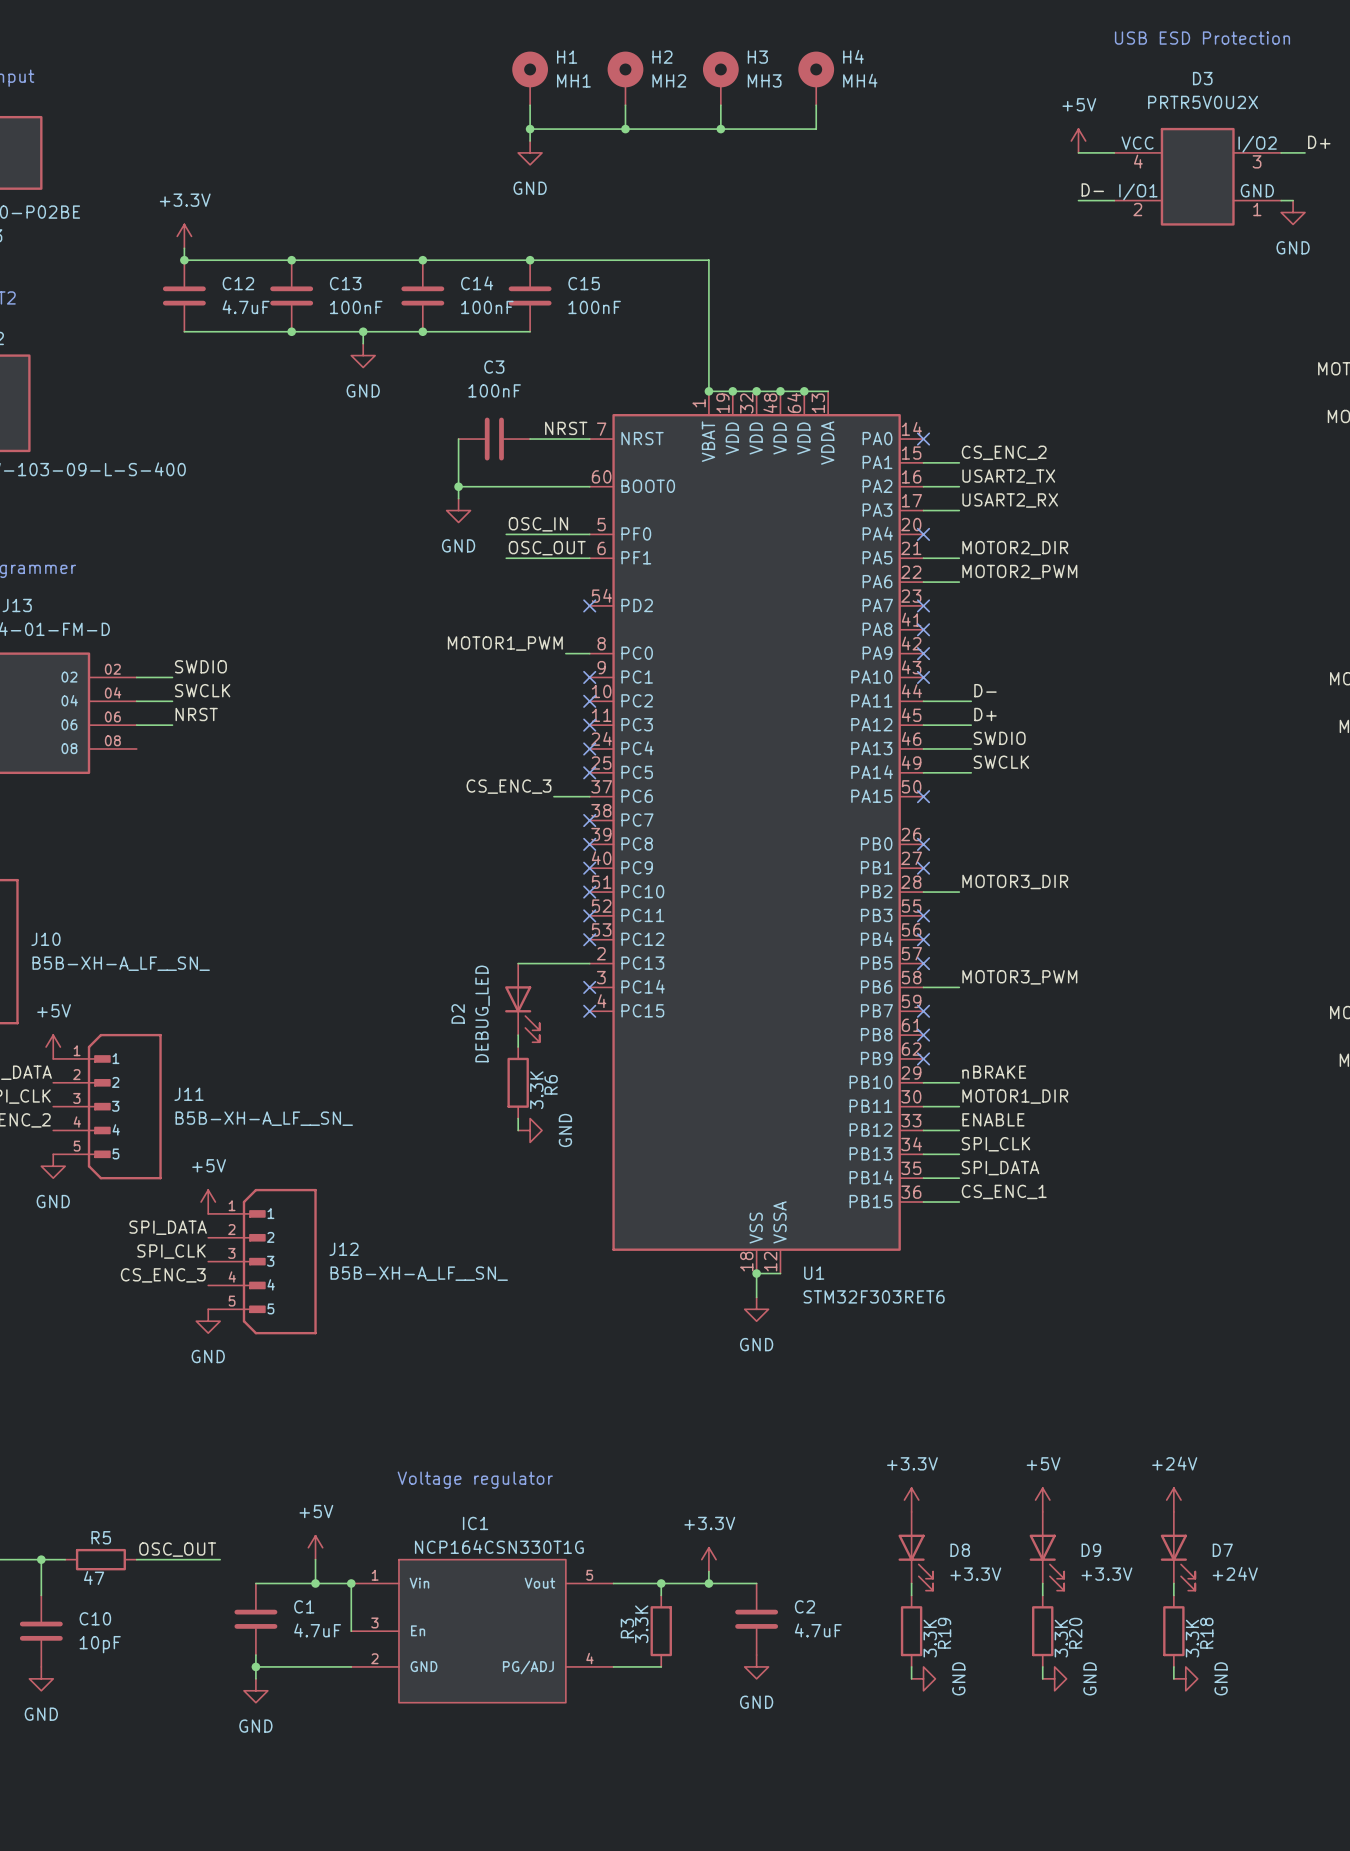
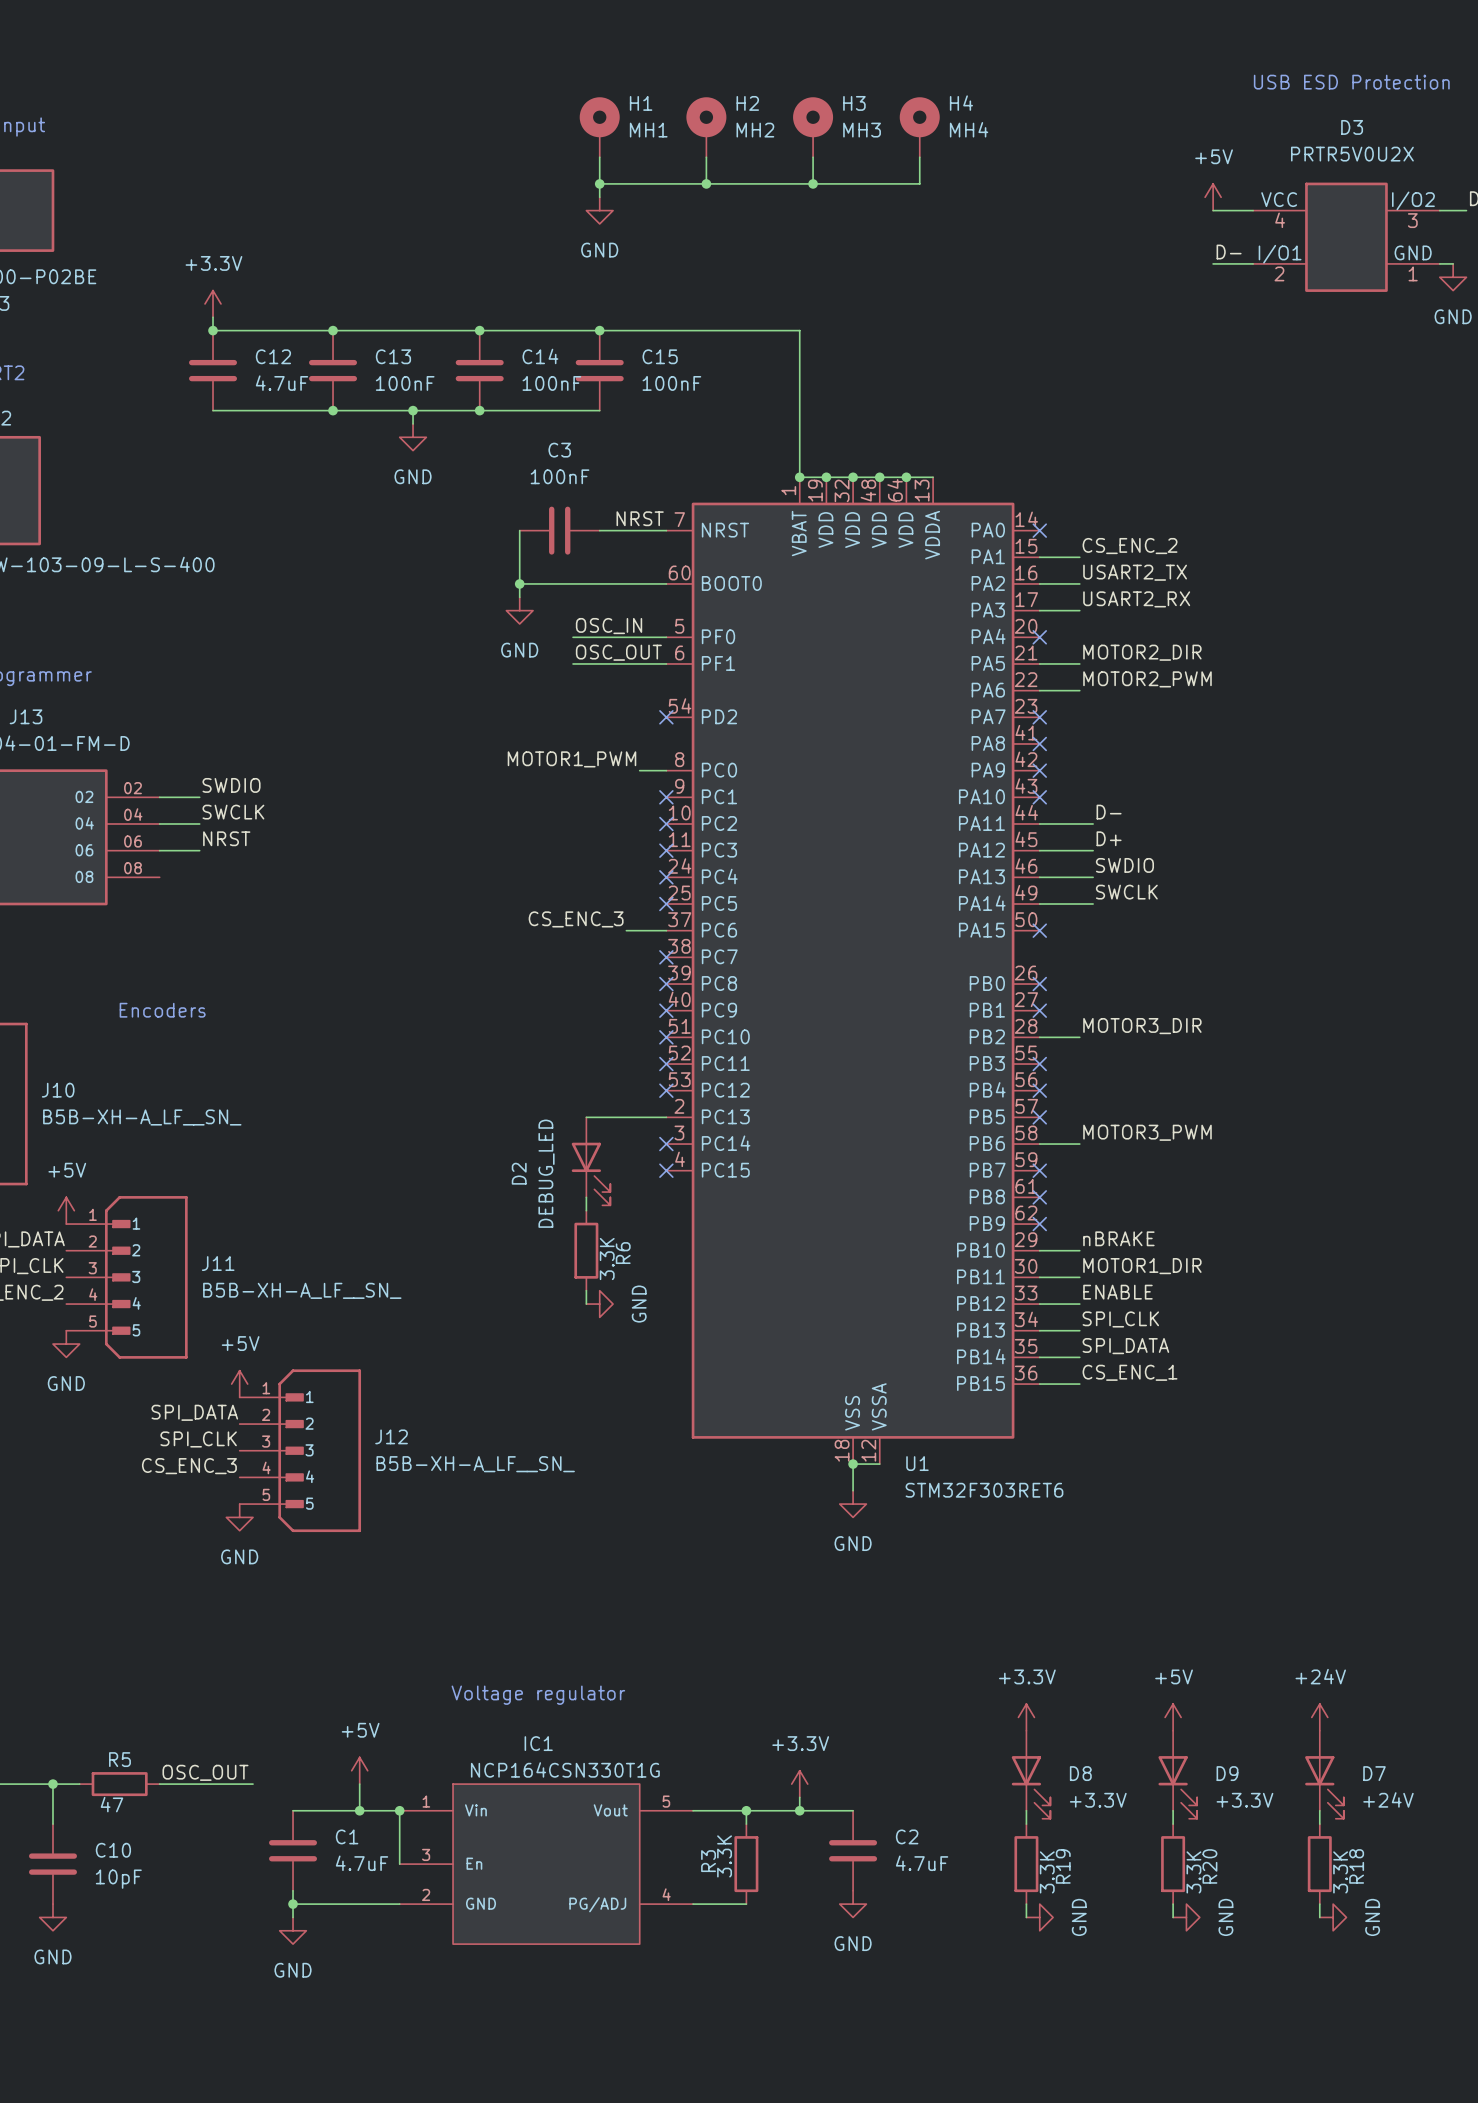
text: none -> Encoders (162, 1010)

